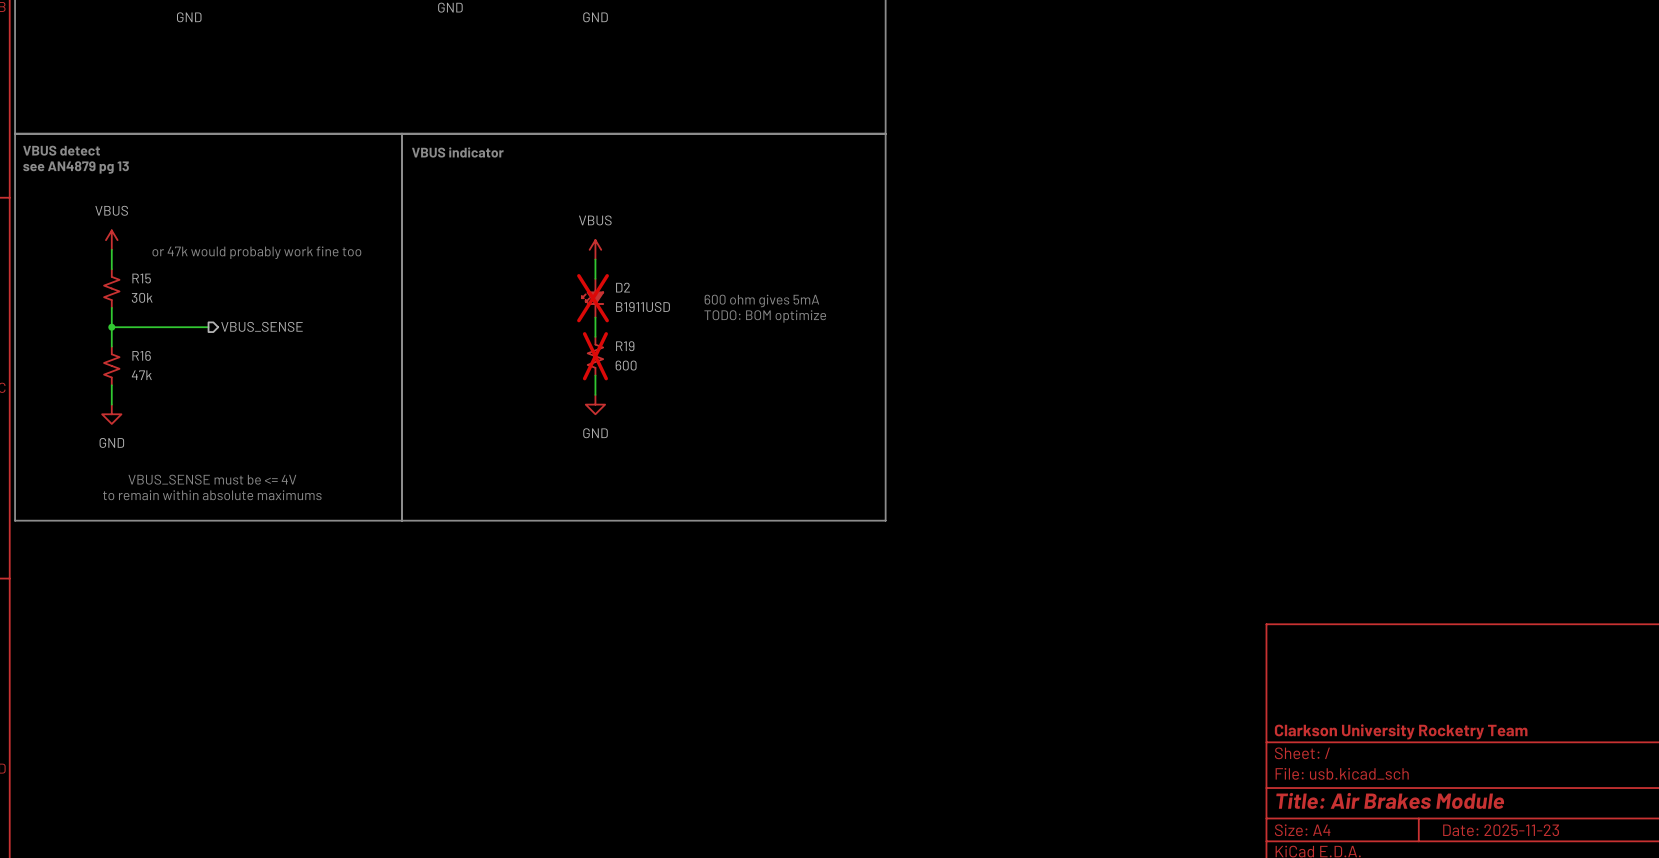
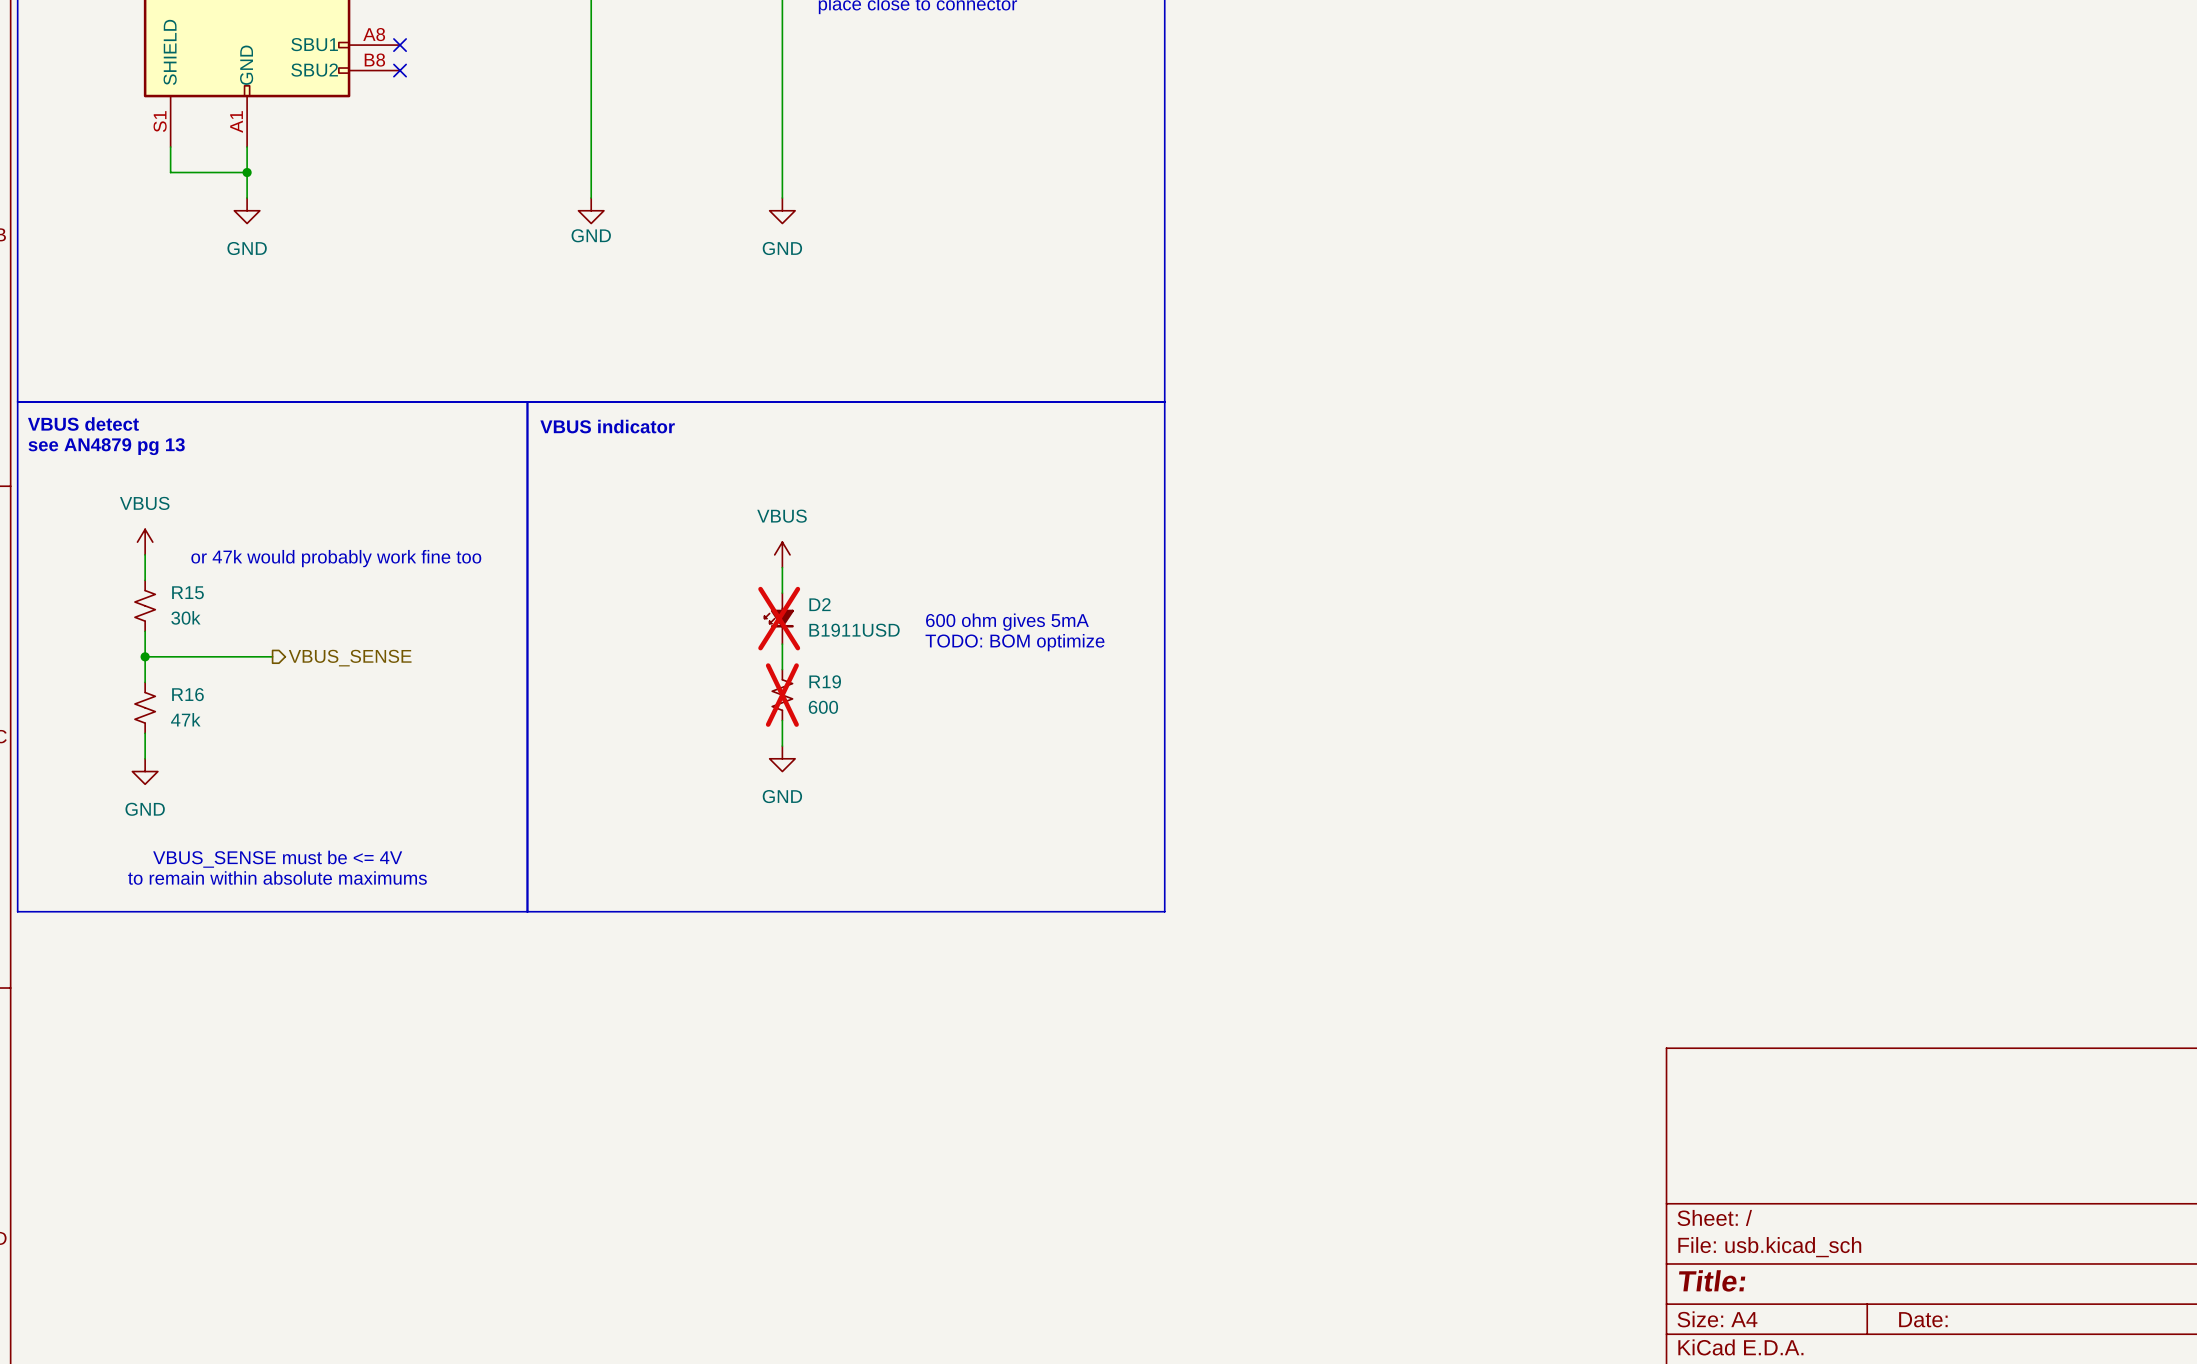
title block: Clarkson University Rocketry Team (1401, 731) -> none
title block: Title: Air Brakes Module (1390, 800) -> Title: (1712, 1280)
title block: Date: 2025-11-23 (1501, 830) -> Date: (1923, 1319)

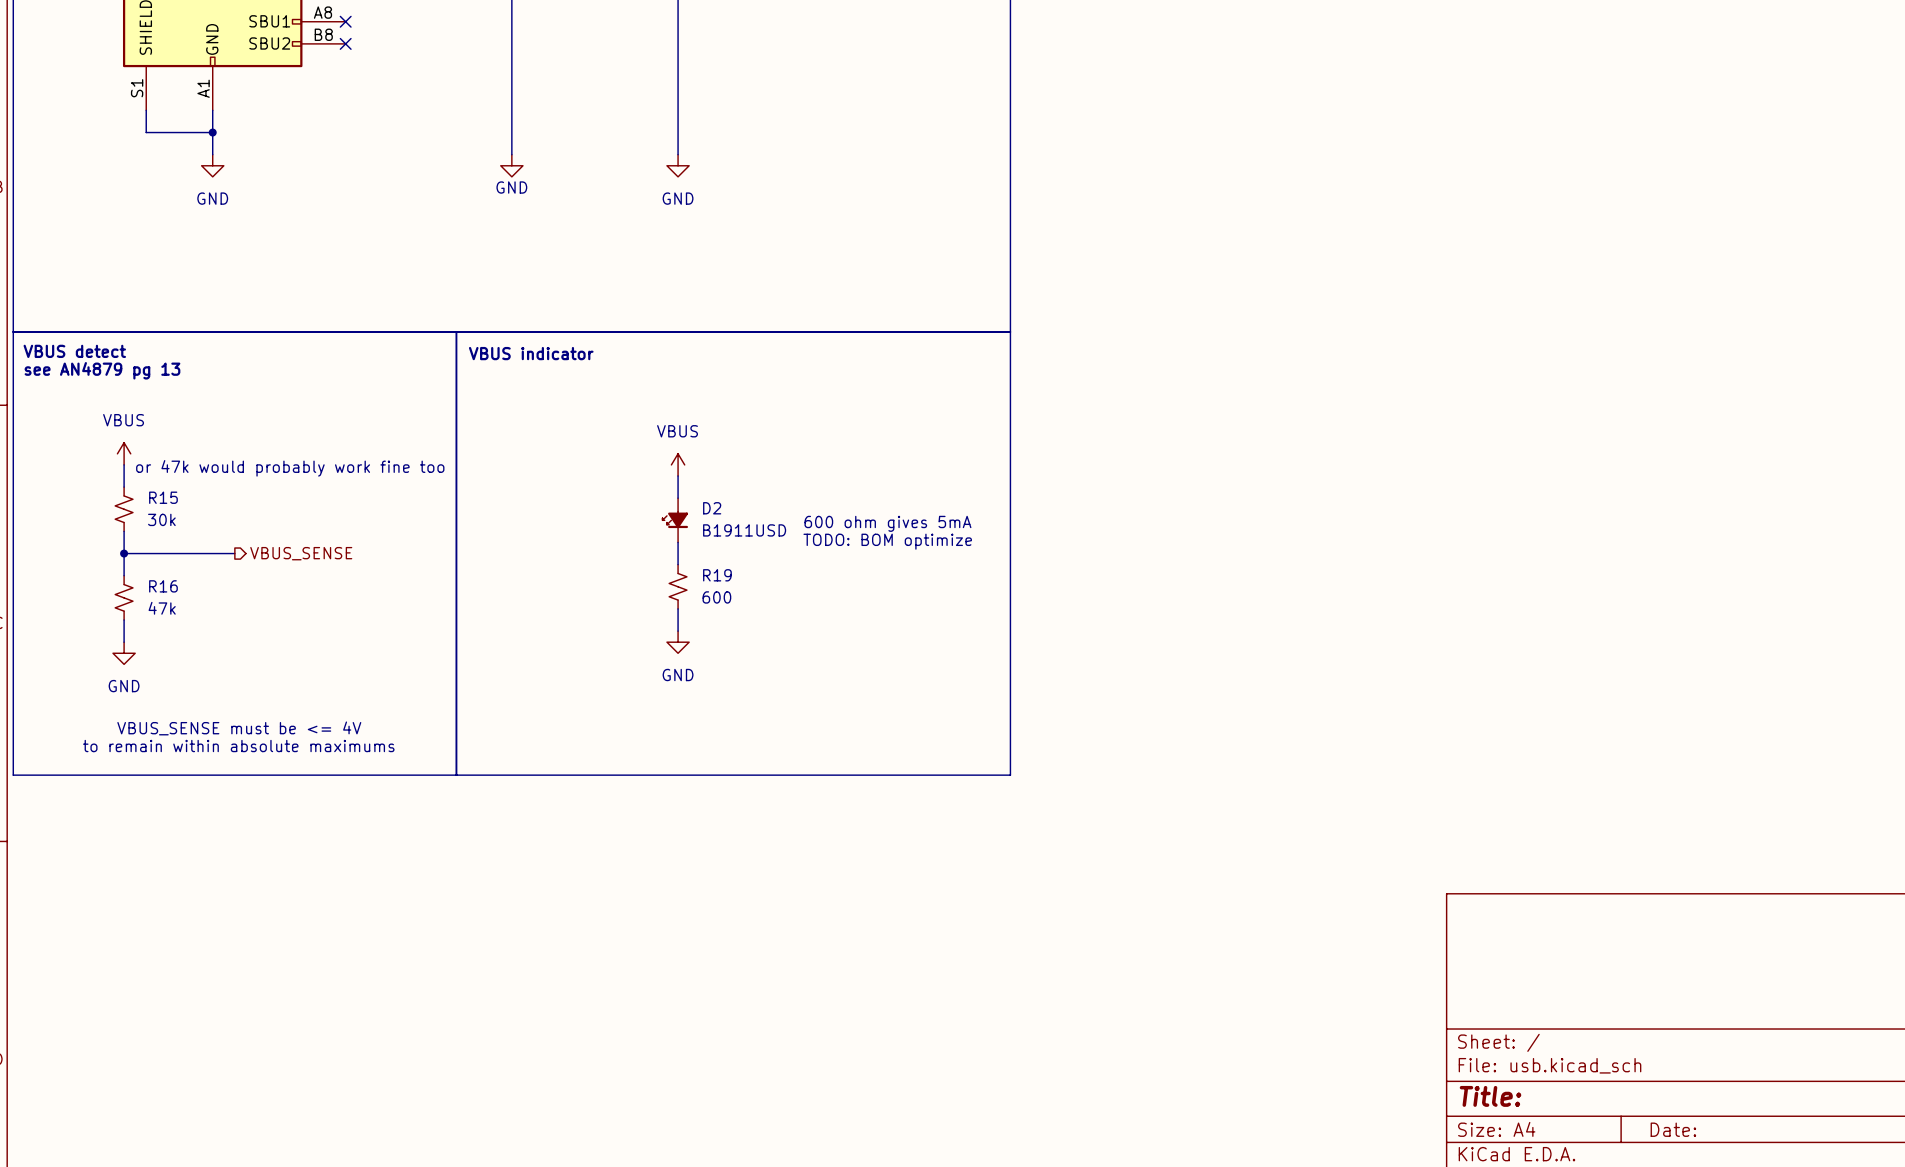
D2 do-not-place cross: (779, 618) -> none
R19 do-not-place cross: (782, 695) -> none

